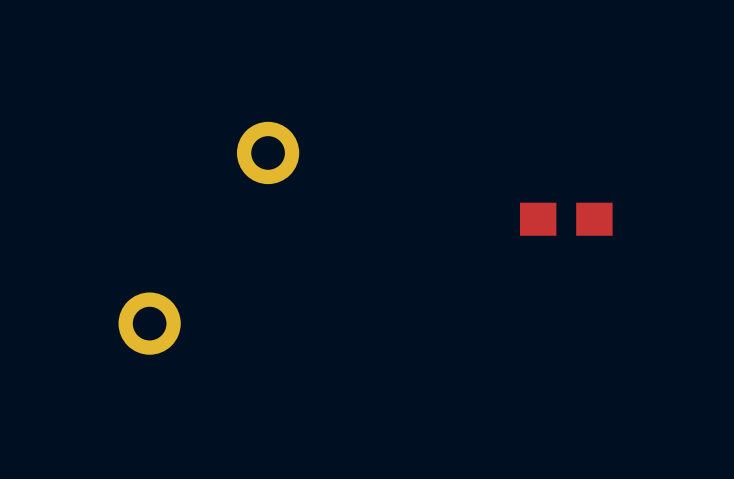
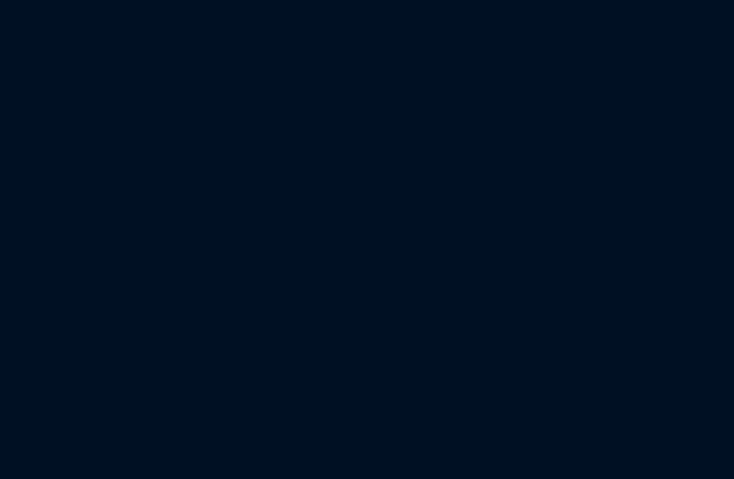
part: (268, 152) -> none
part: (566, 219) -> none
part: (149, 323) -> none

